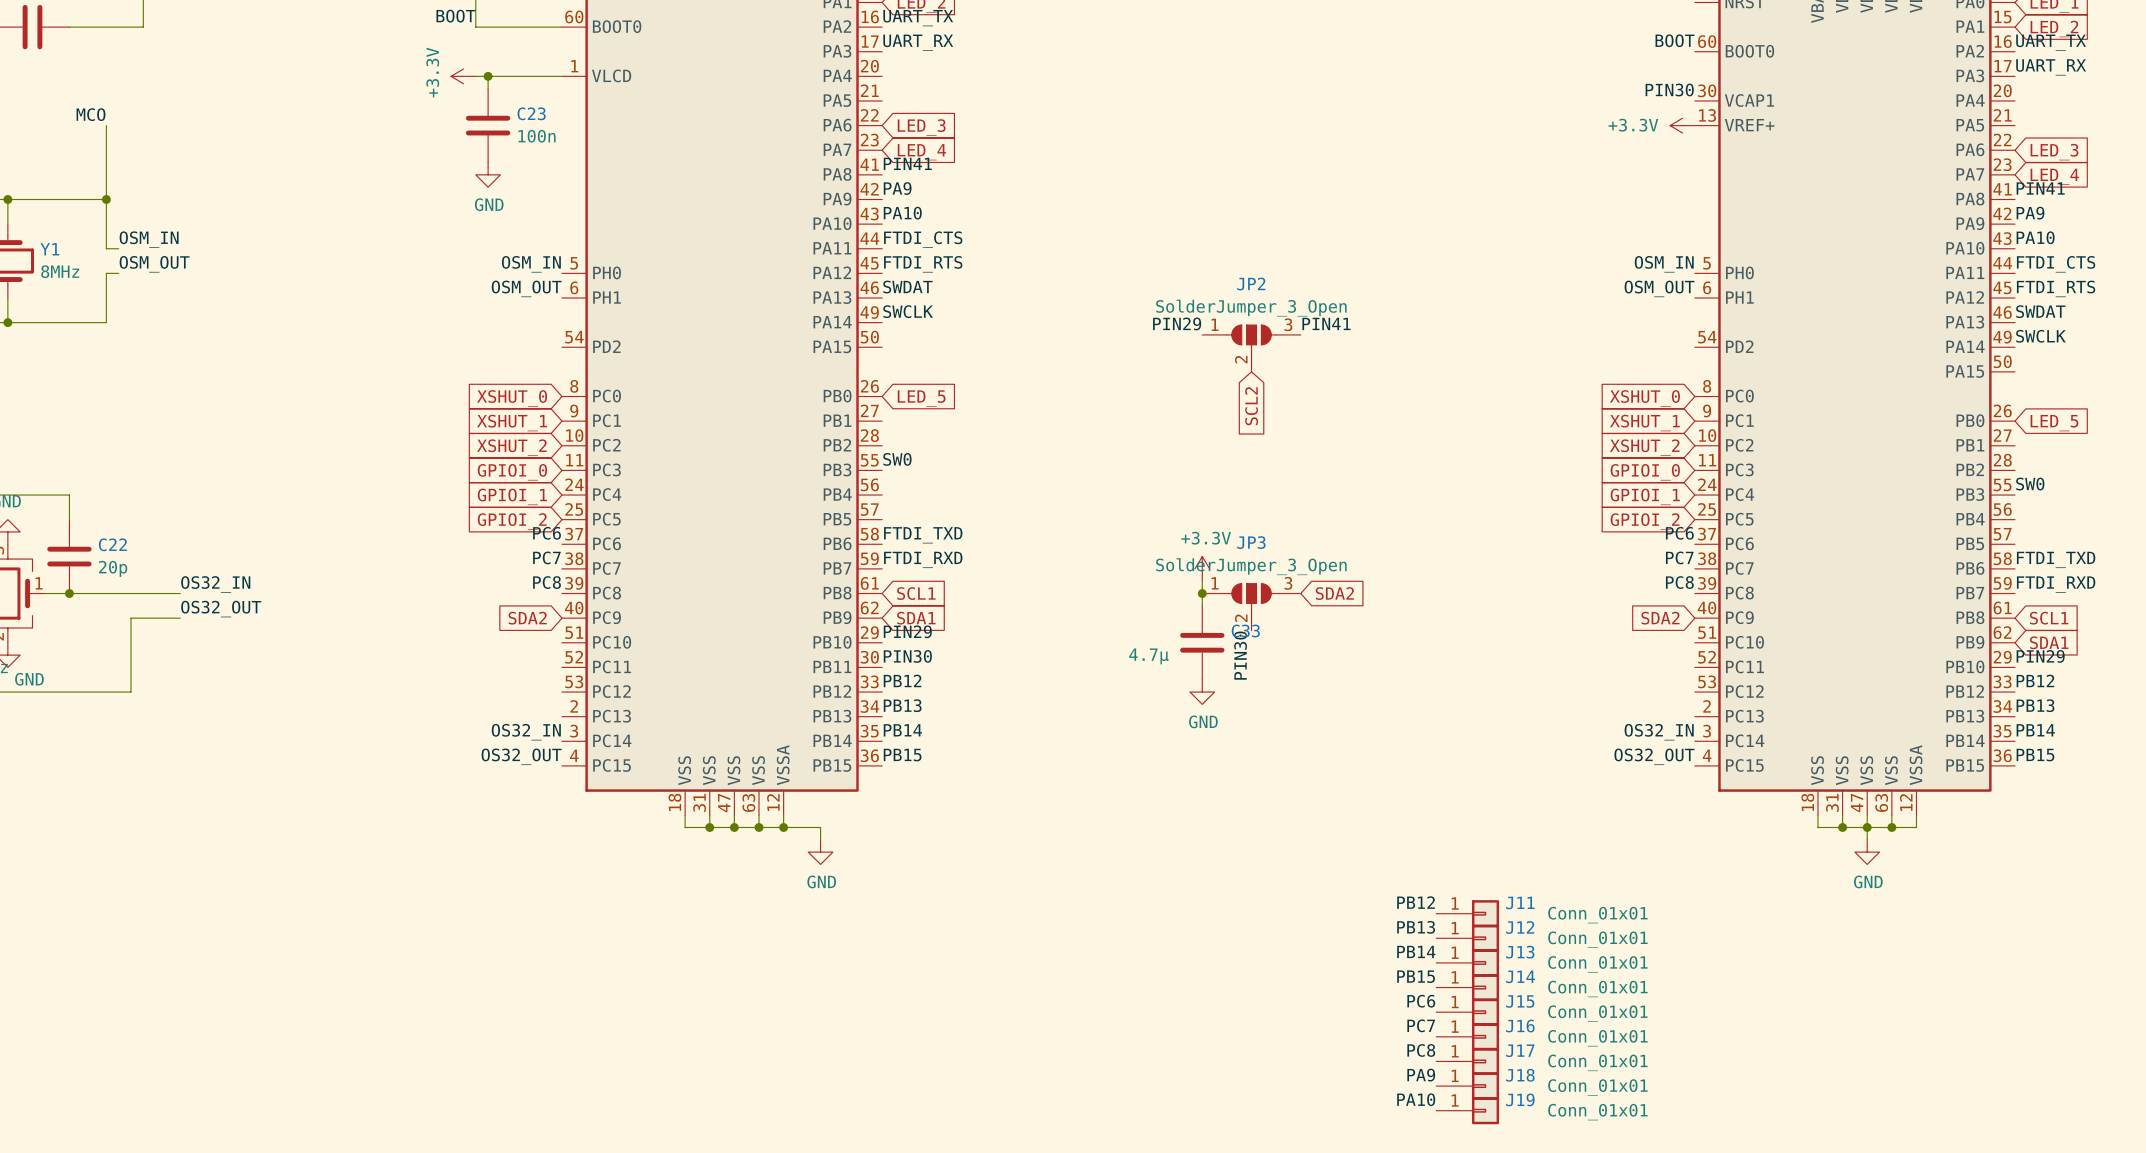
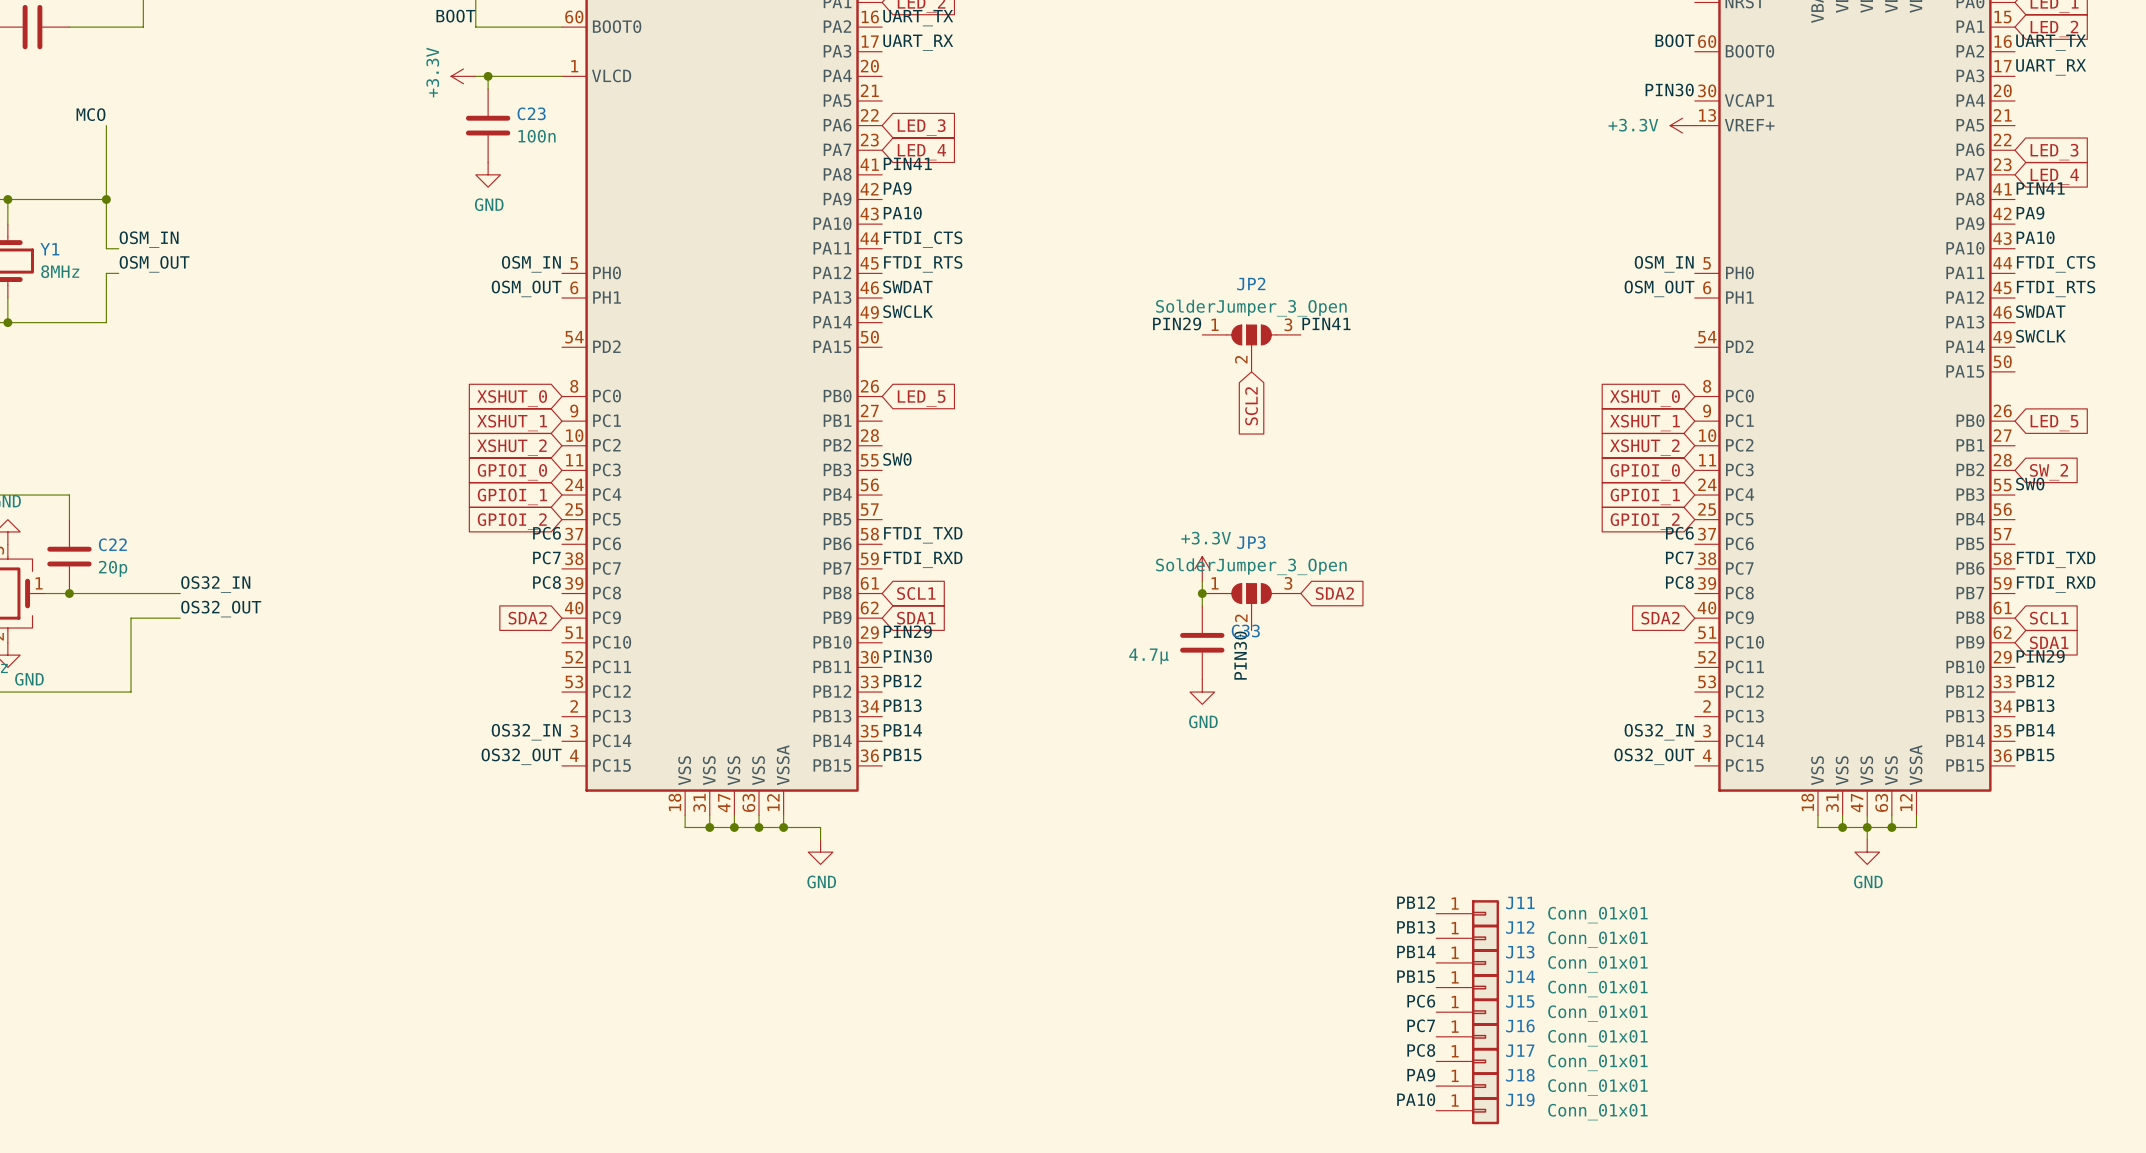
global label: none -> SW_2 (2049, 472)

